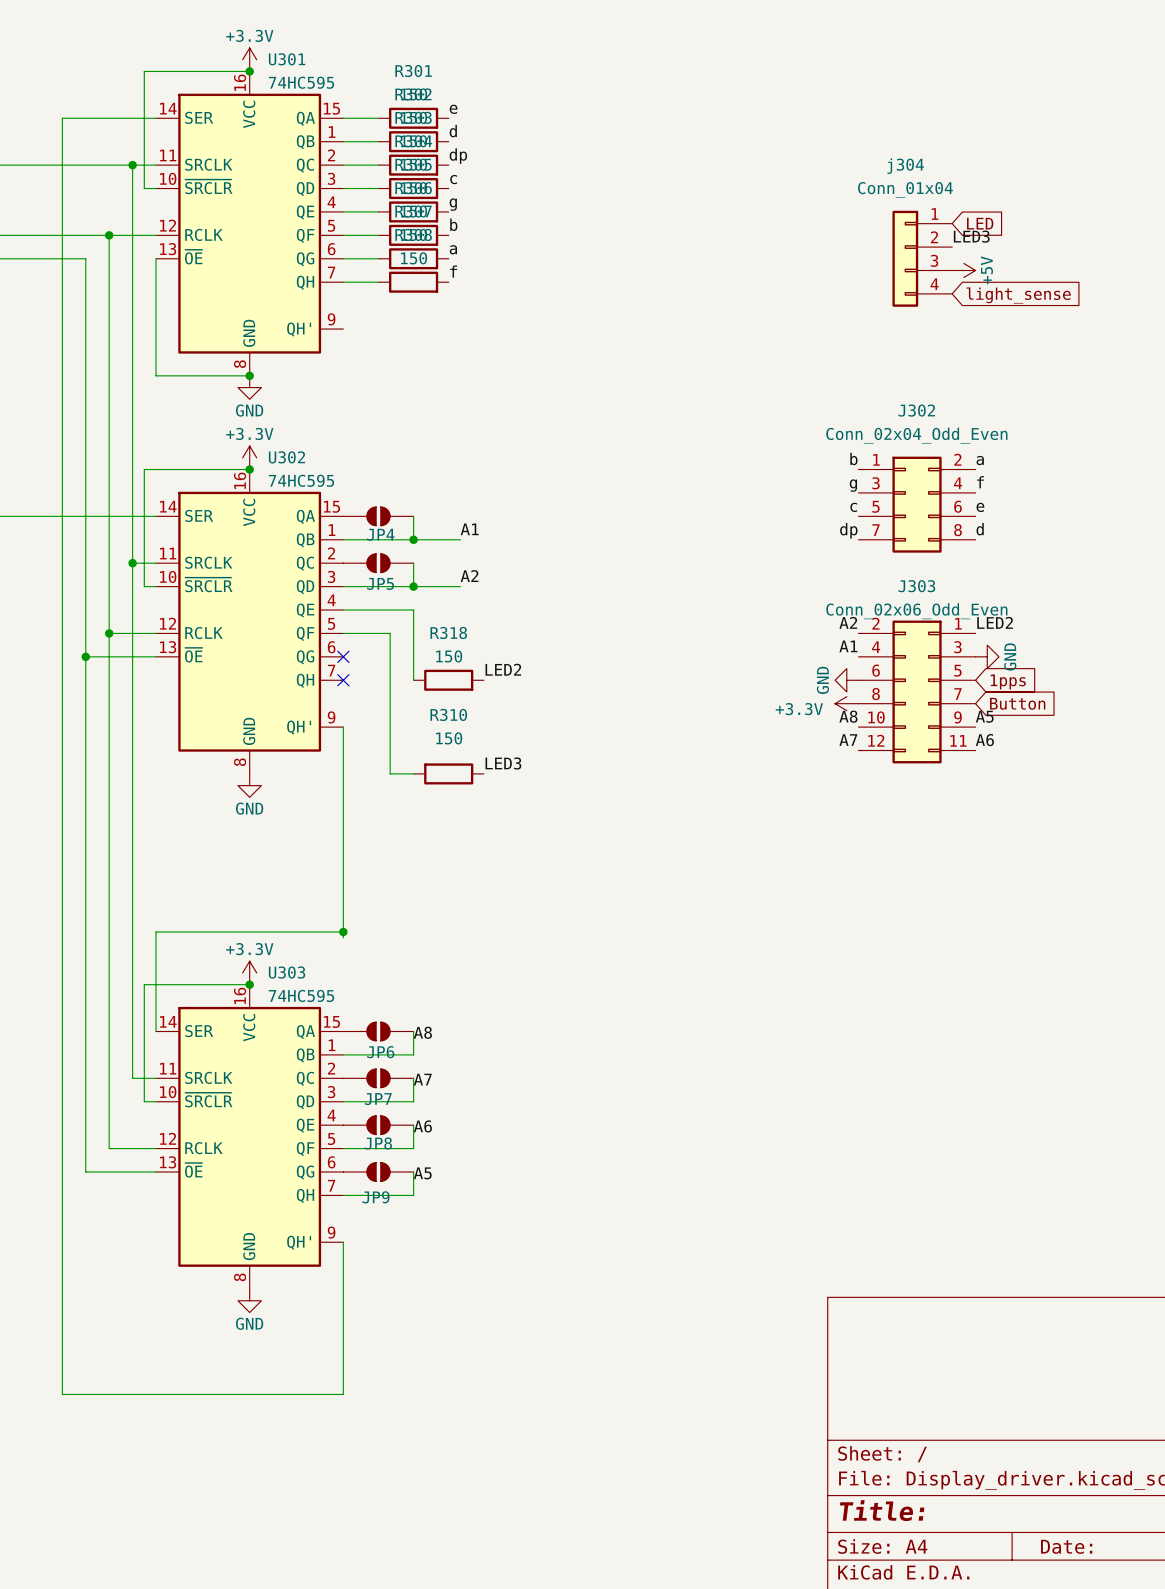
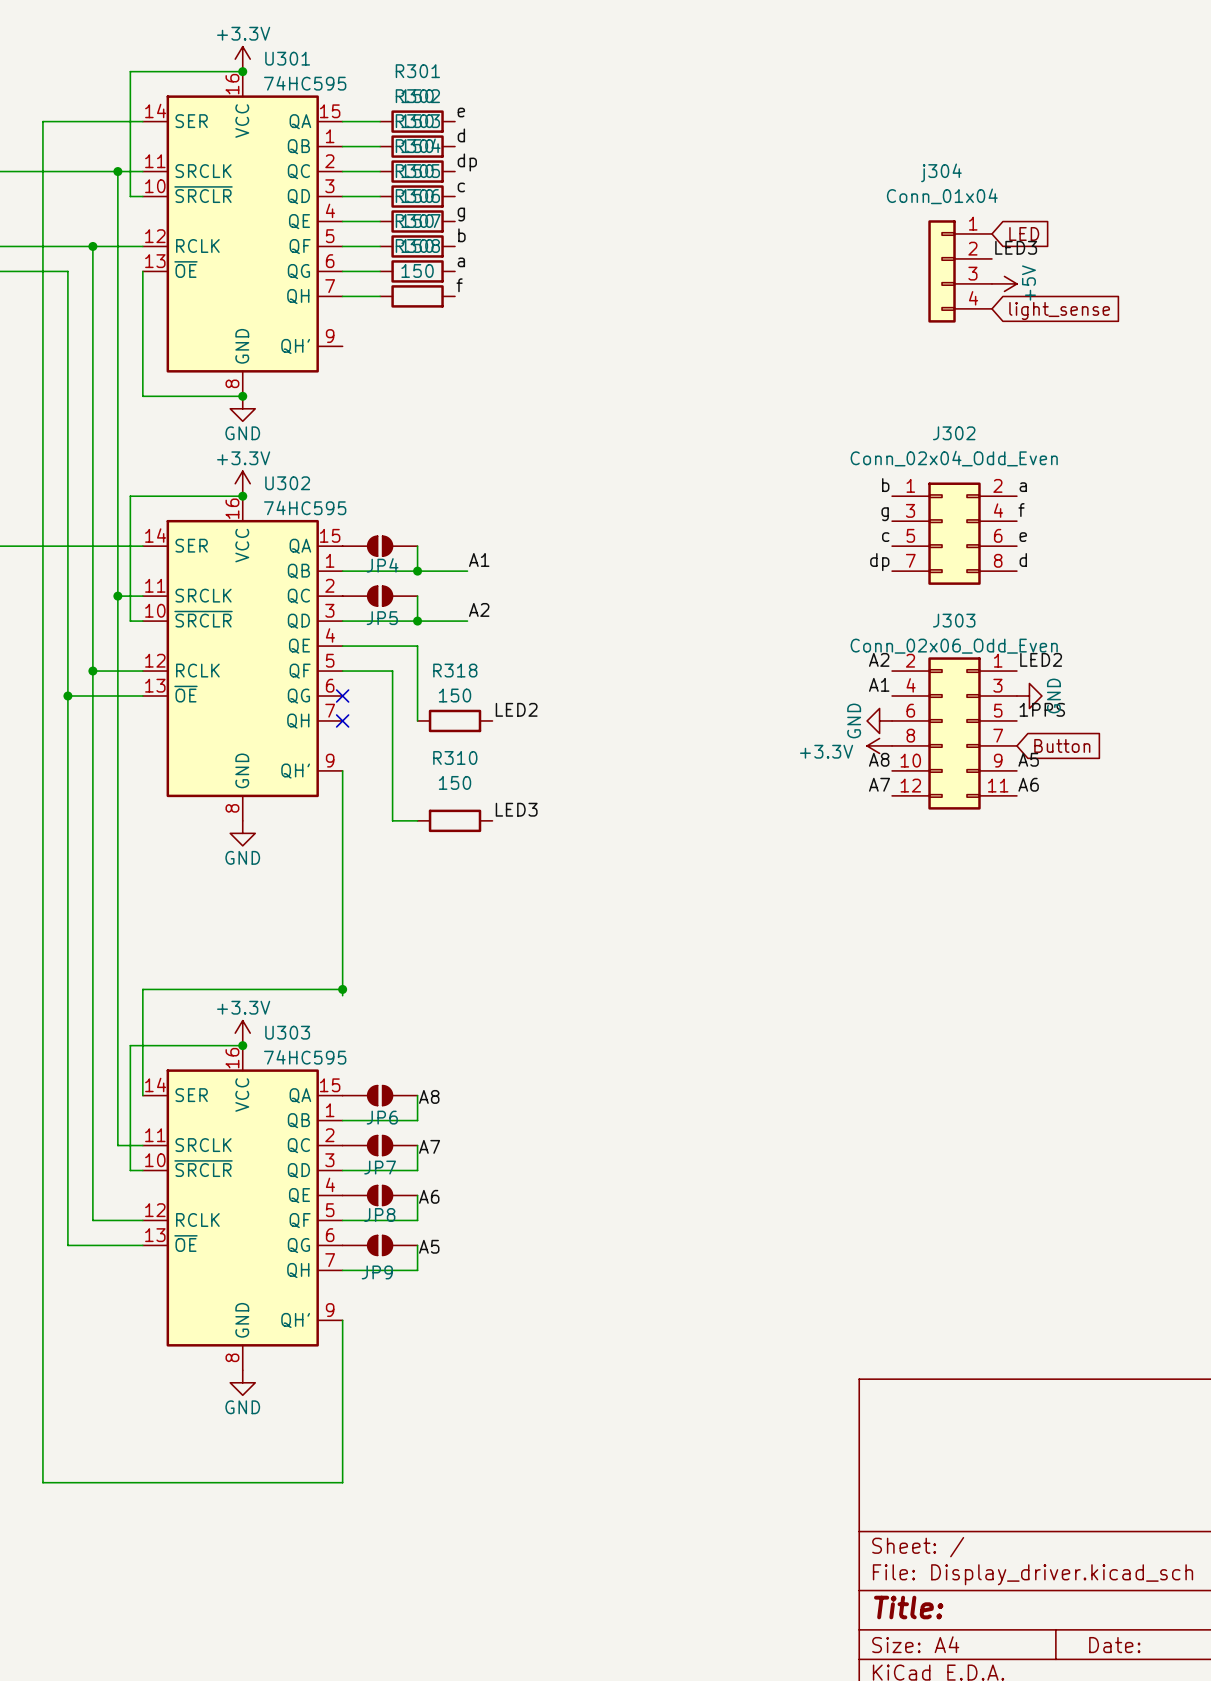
label: none -> 1PPS (1042, 709)
global label: 1pps (1008, 681) -> none

